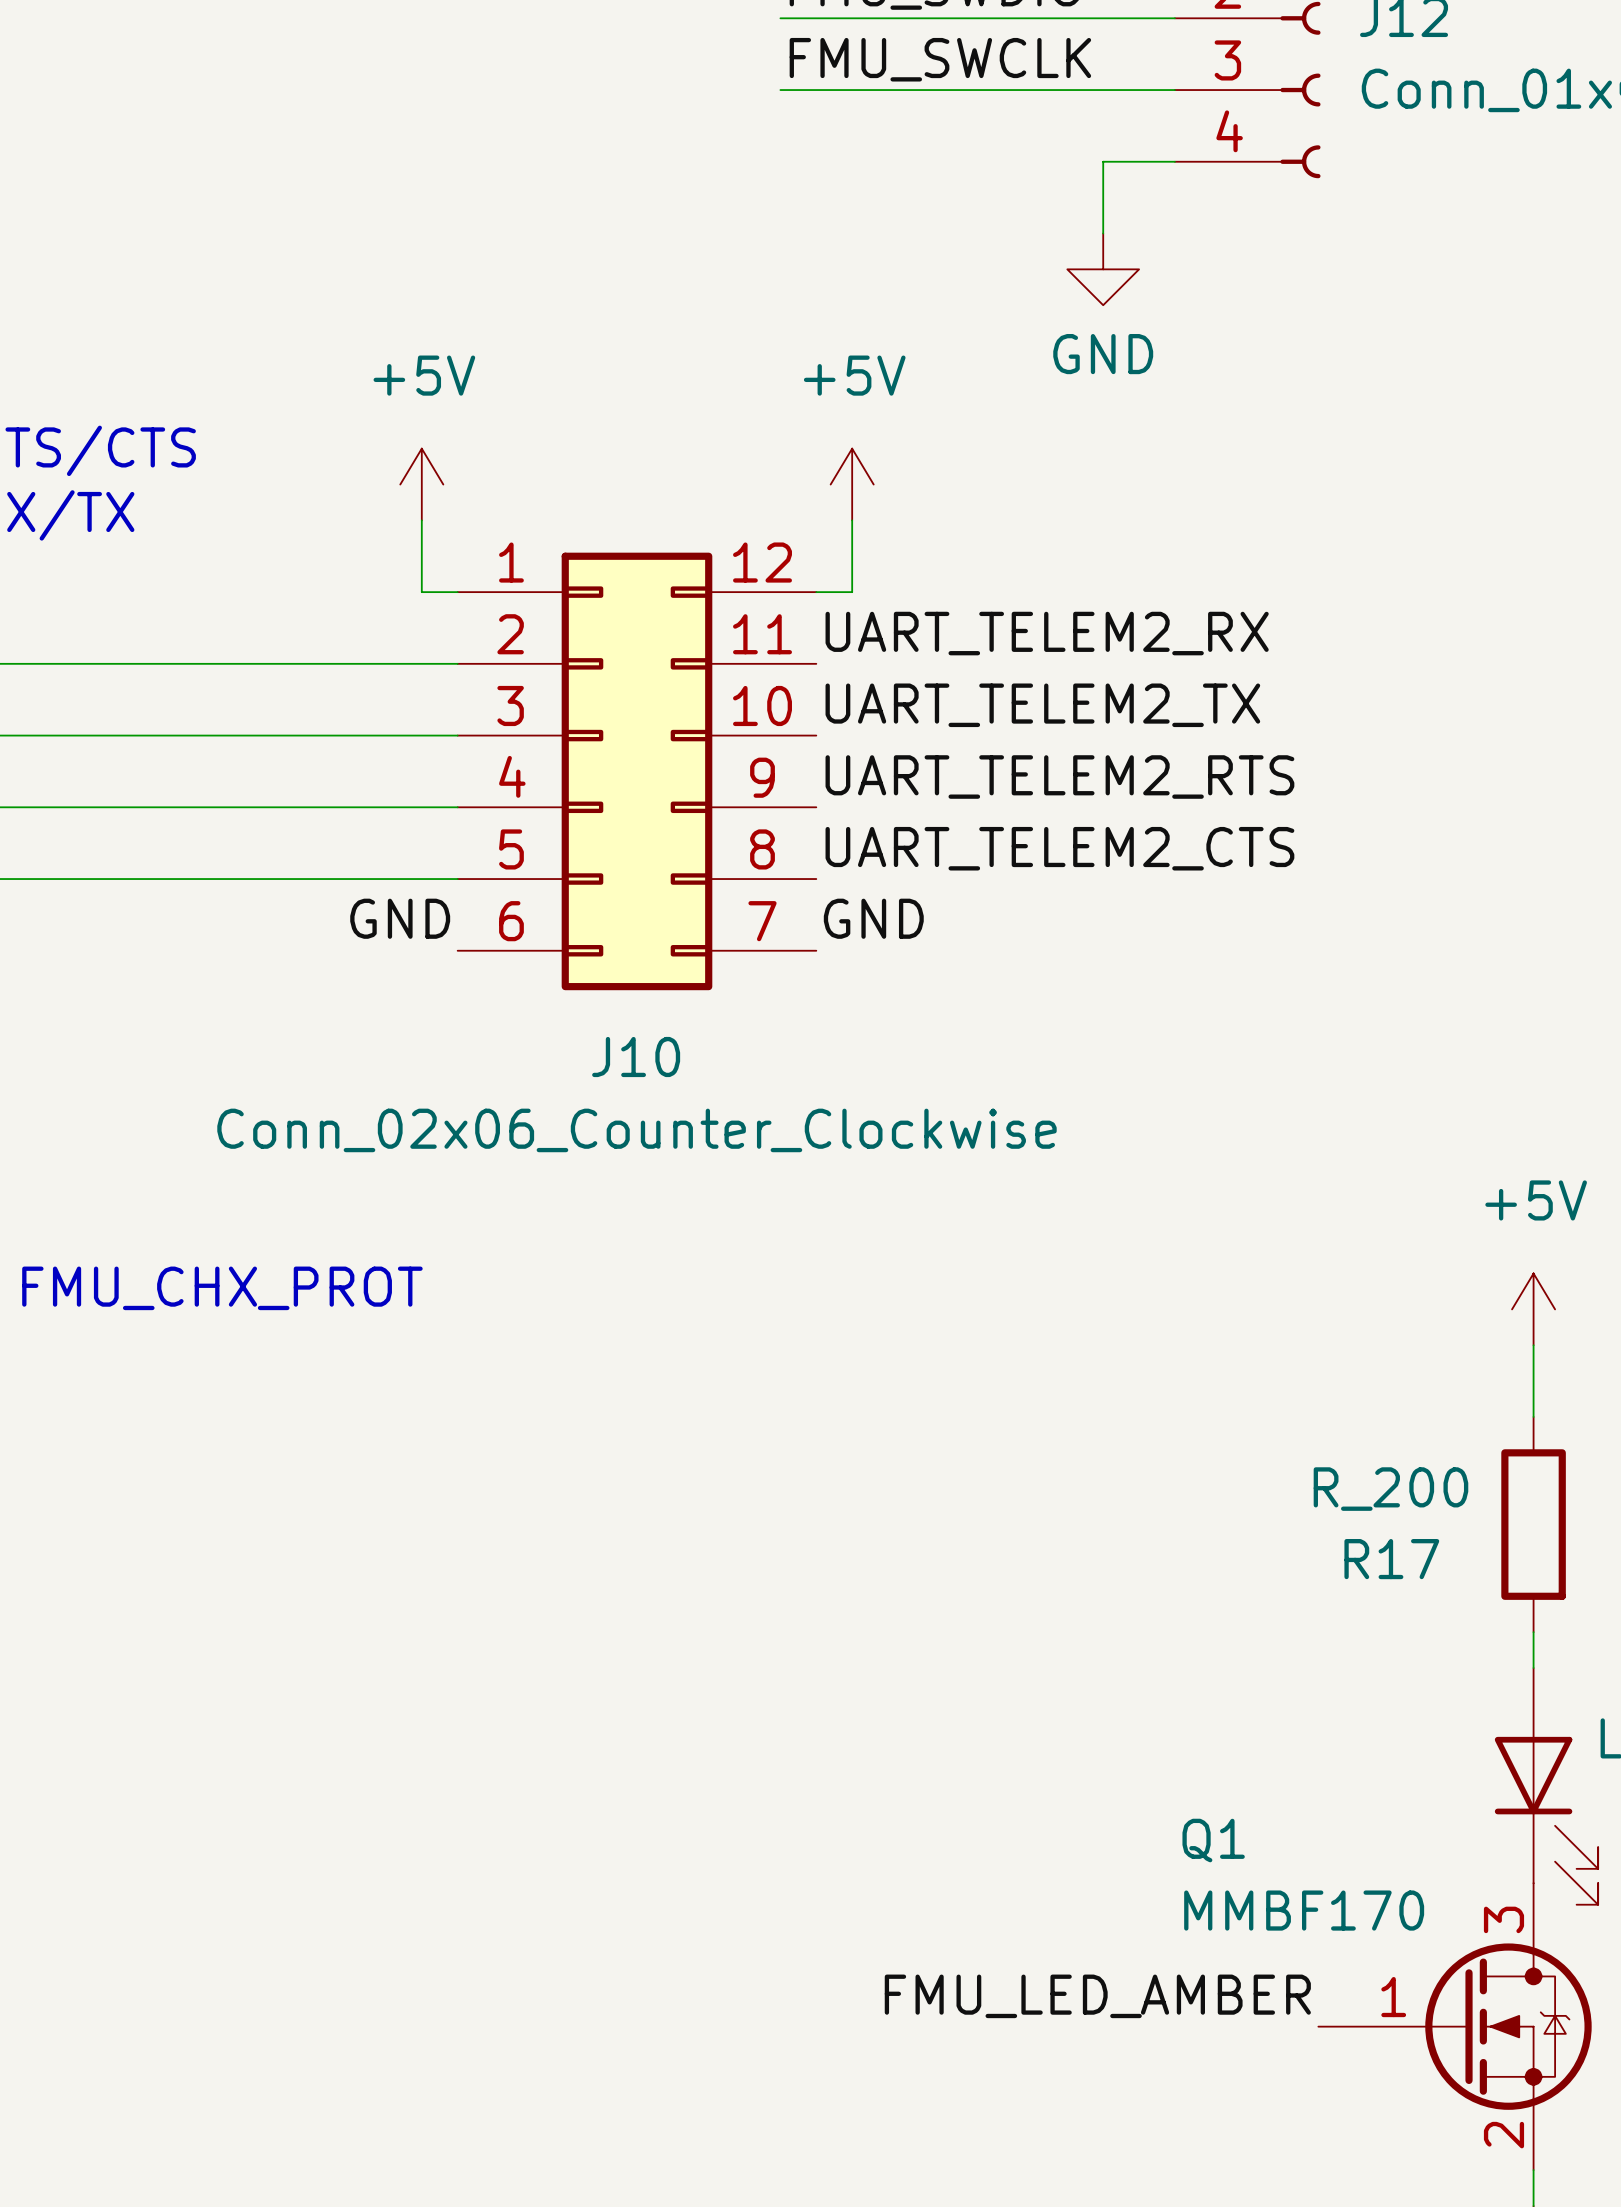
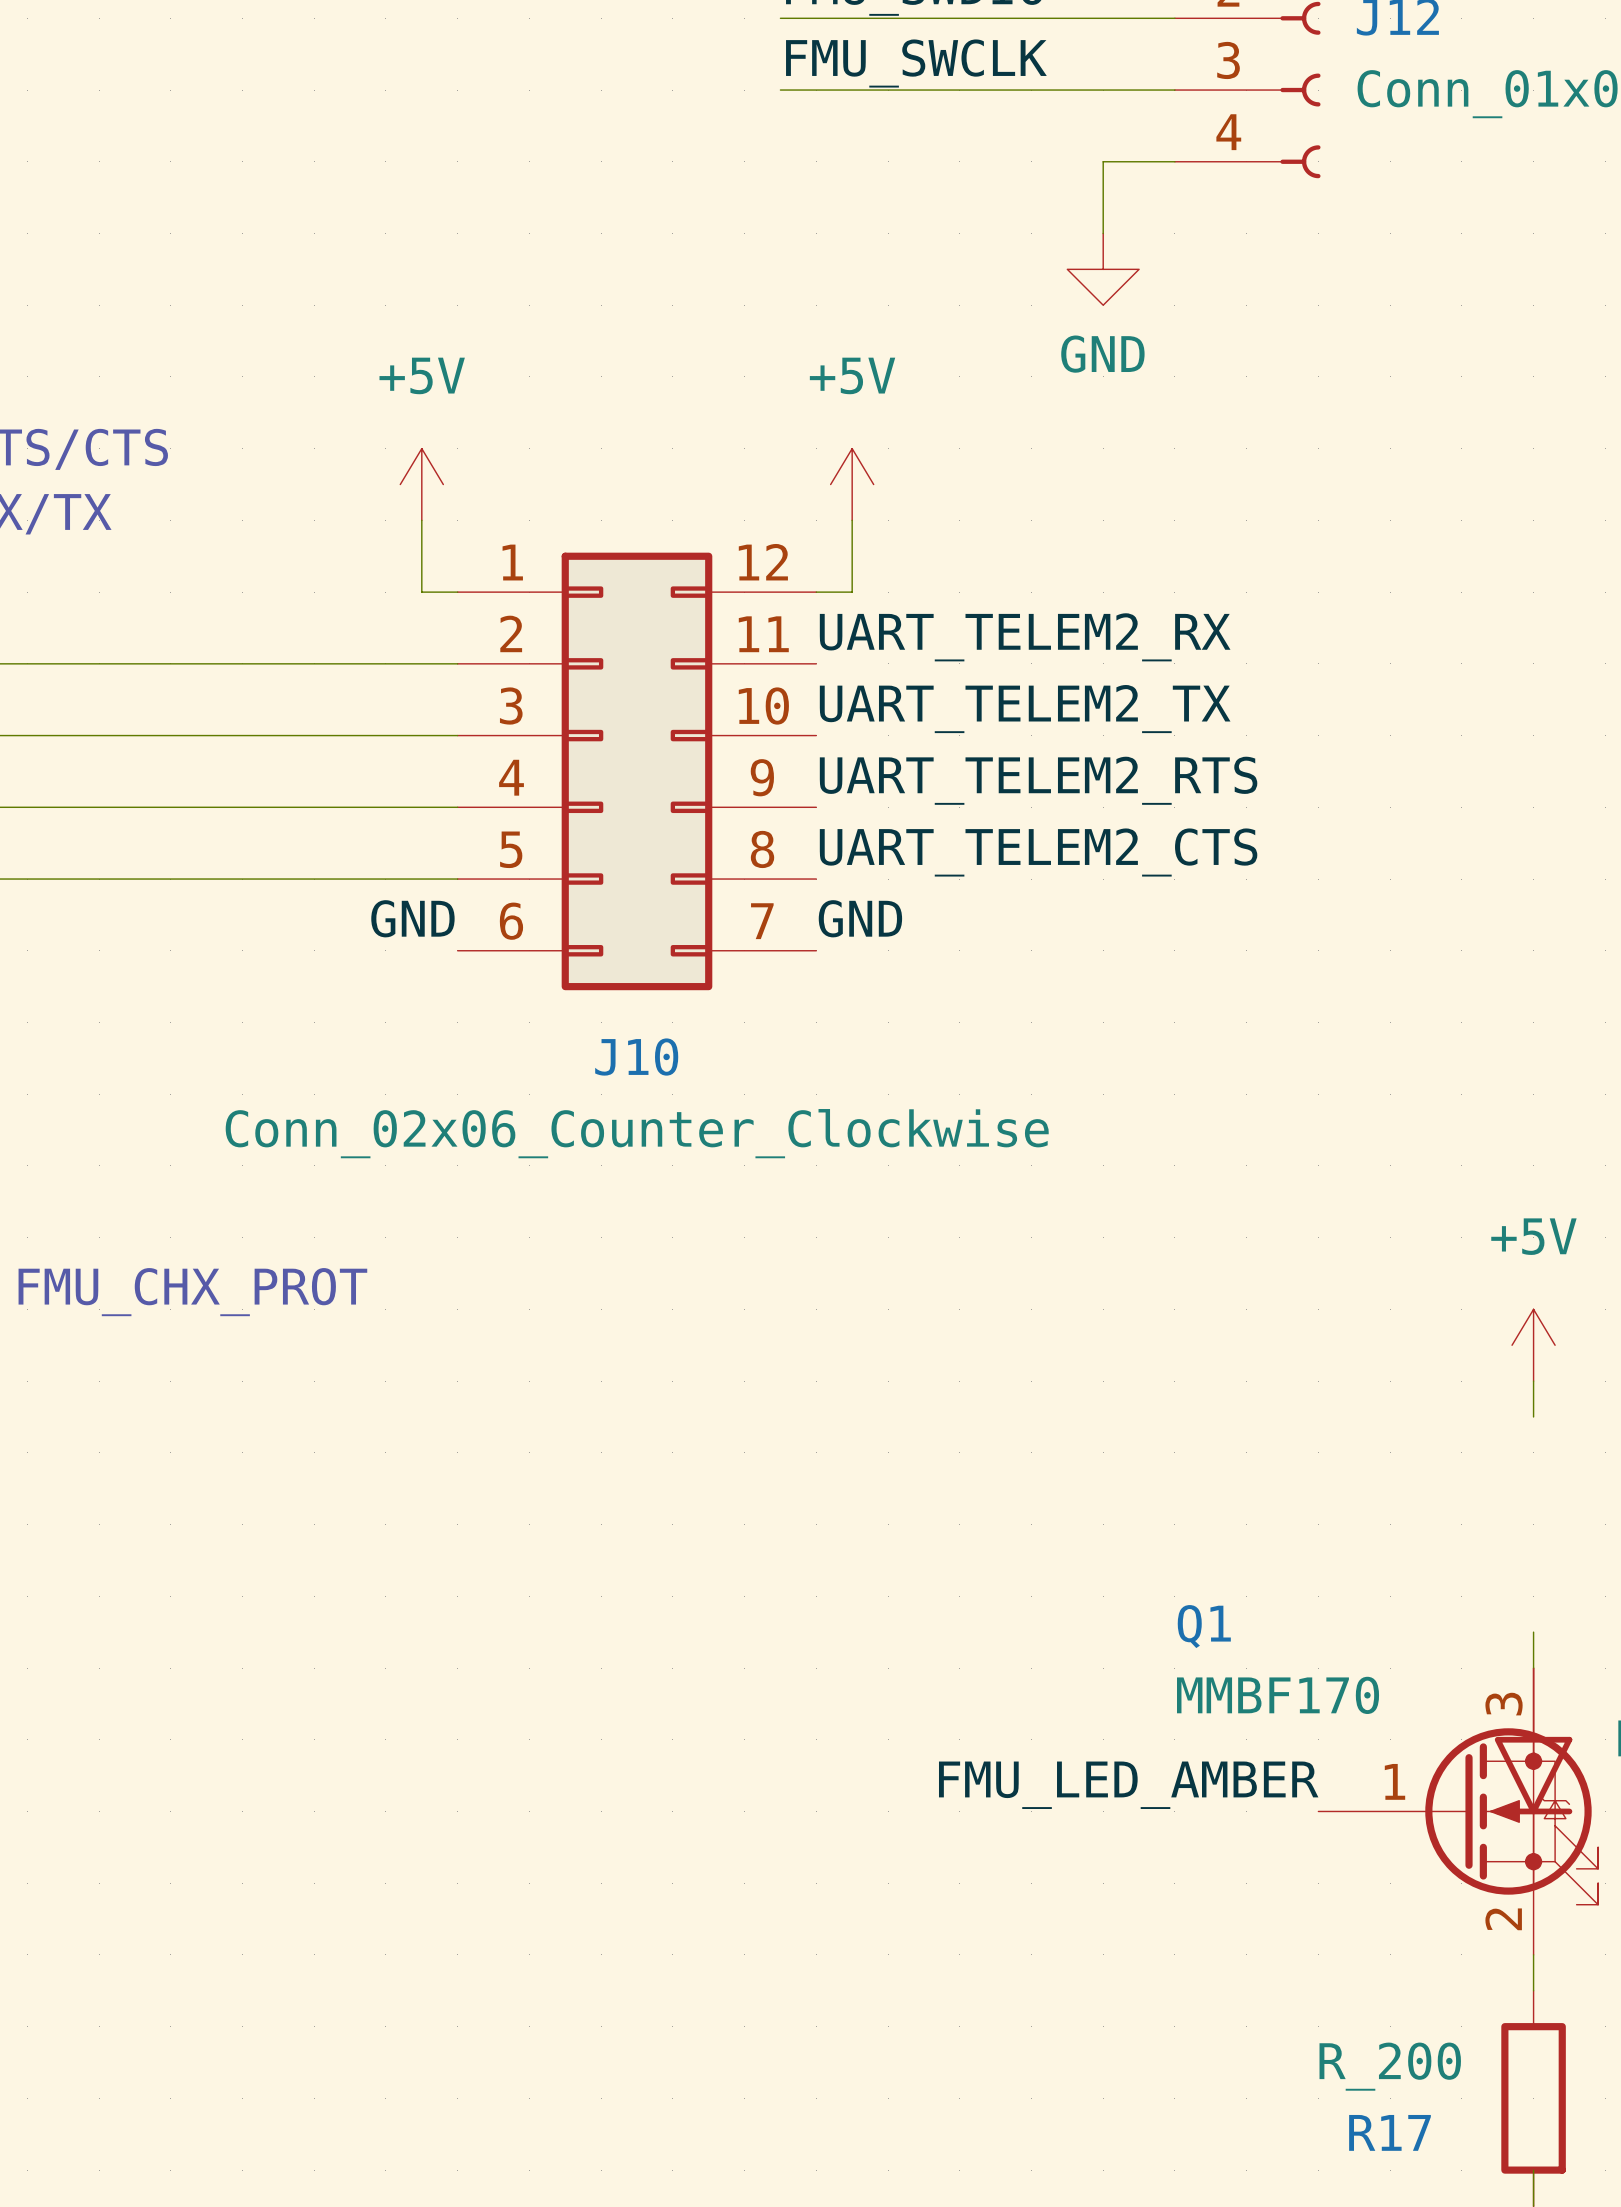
power symbol position: +5V (1533, 1309) -> +5V (1533, 1345)
R17 position: (1533, 1524) -> (1533, 2098)
label position: FMU_LED_AMBER (1097, 1996) -> FMU_LED_AMBER (1128, 1785)
Q1 position: (1455, 2026) -> (1455, 1811)

